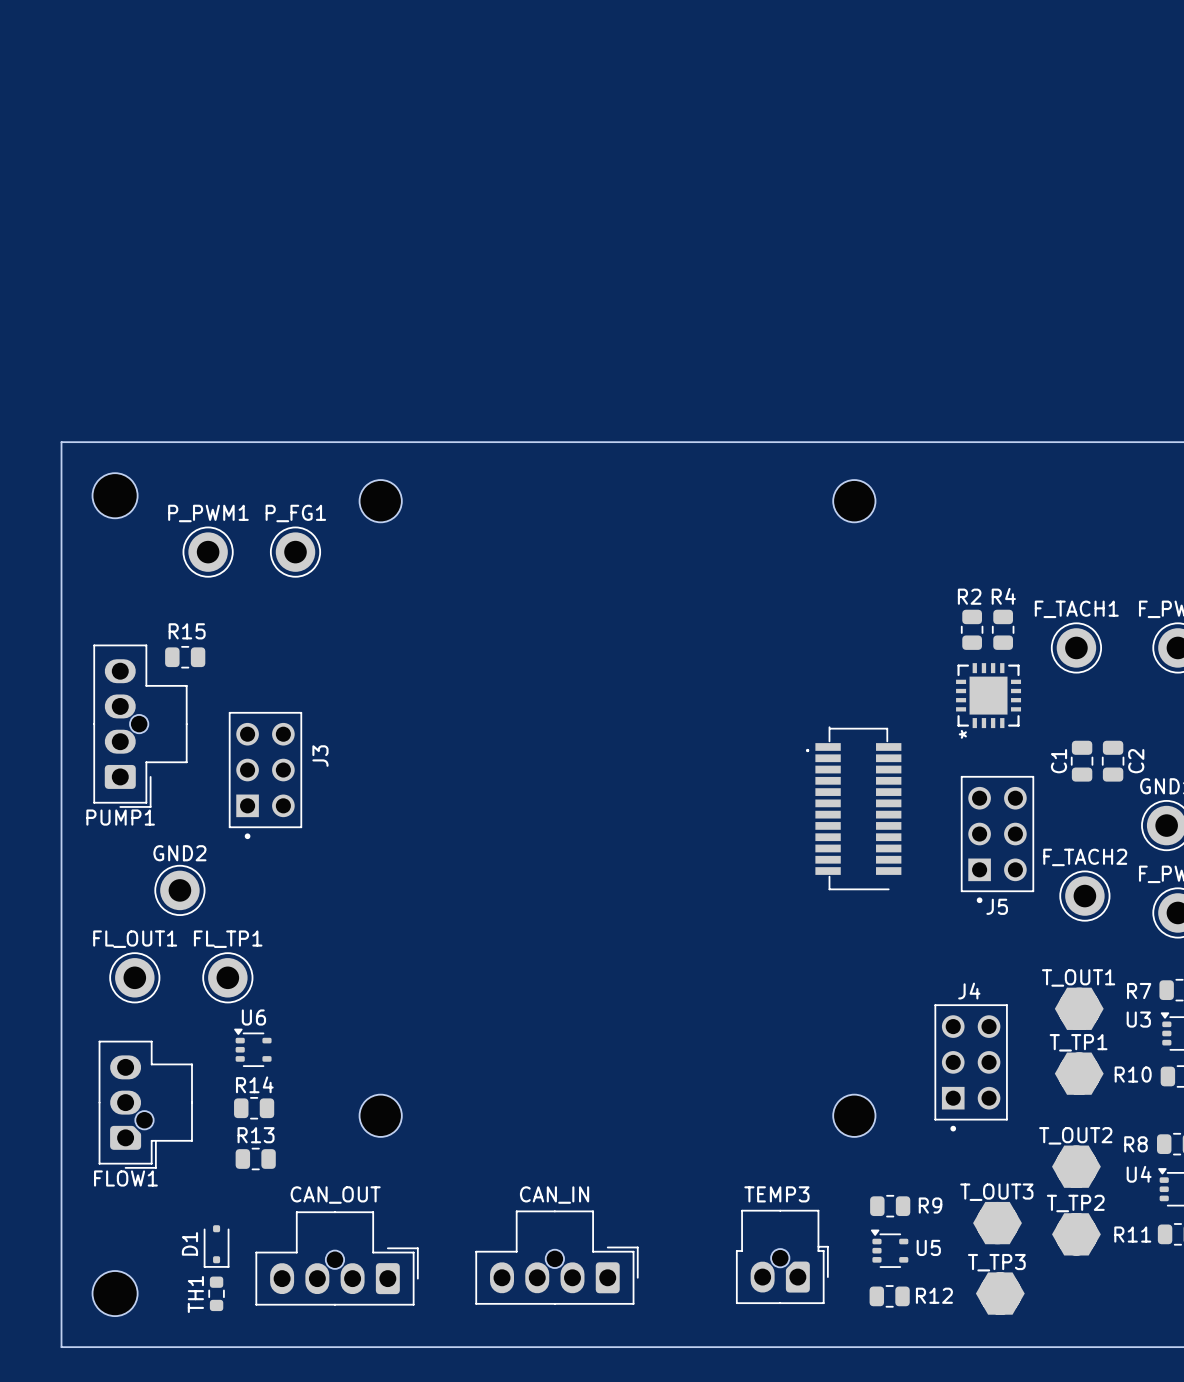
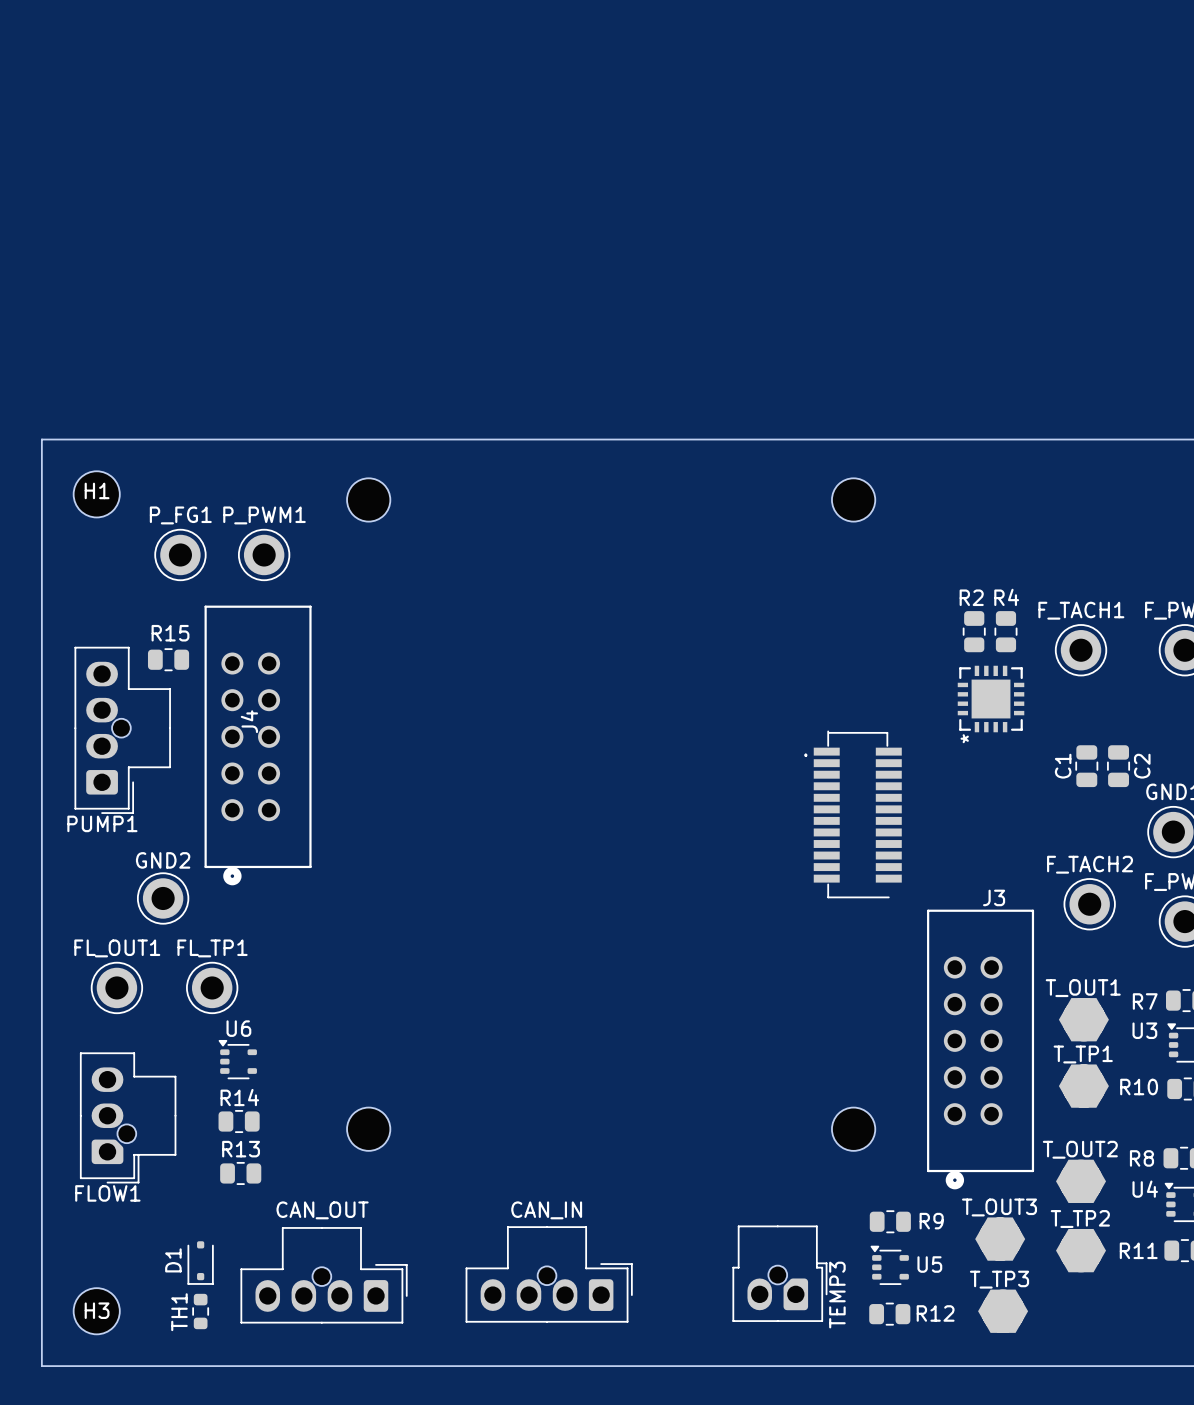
H1 name: none -> H1 (97, 490)
P_PWM1 position: (208, 552) -> (264, 554)
P_FG1 position: (295, 552) -> (180, 554)
J3 footprint: [228, 711, 303, 840] -> [927, 909, 1035, 1190]
J3 name position: J3 (320, 756) -> J3 (994, 897)
J5: (997, 839) -> none
J4 name position: J4 (969, 991) -> J4 (249, 721)
J4 footprint: [934, 1004, 1008, 1132] -> [204, 605, 312, 886]
TEMP3 name rotation: 0° (776, 1194) -> 90° counterclockwise (837, 1295)
TEMP3 name position: TEMP3 (776, 1194) -> TEMP3 (837, 1295)
H3 name: none -> H3 (97, 1310)

